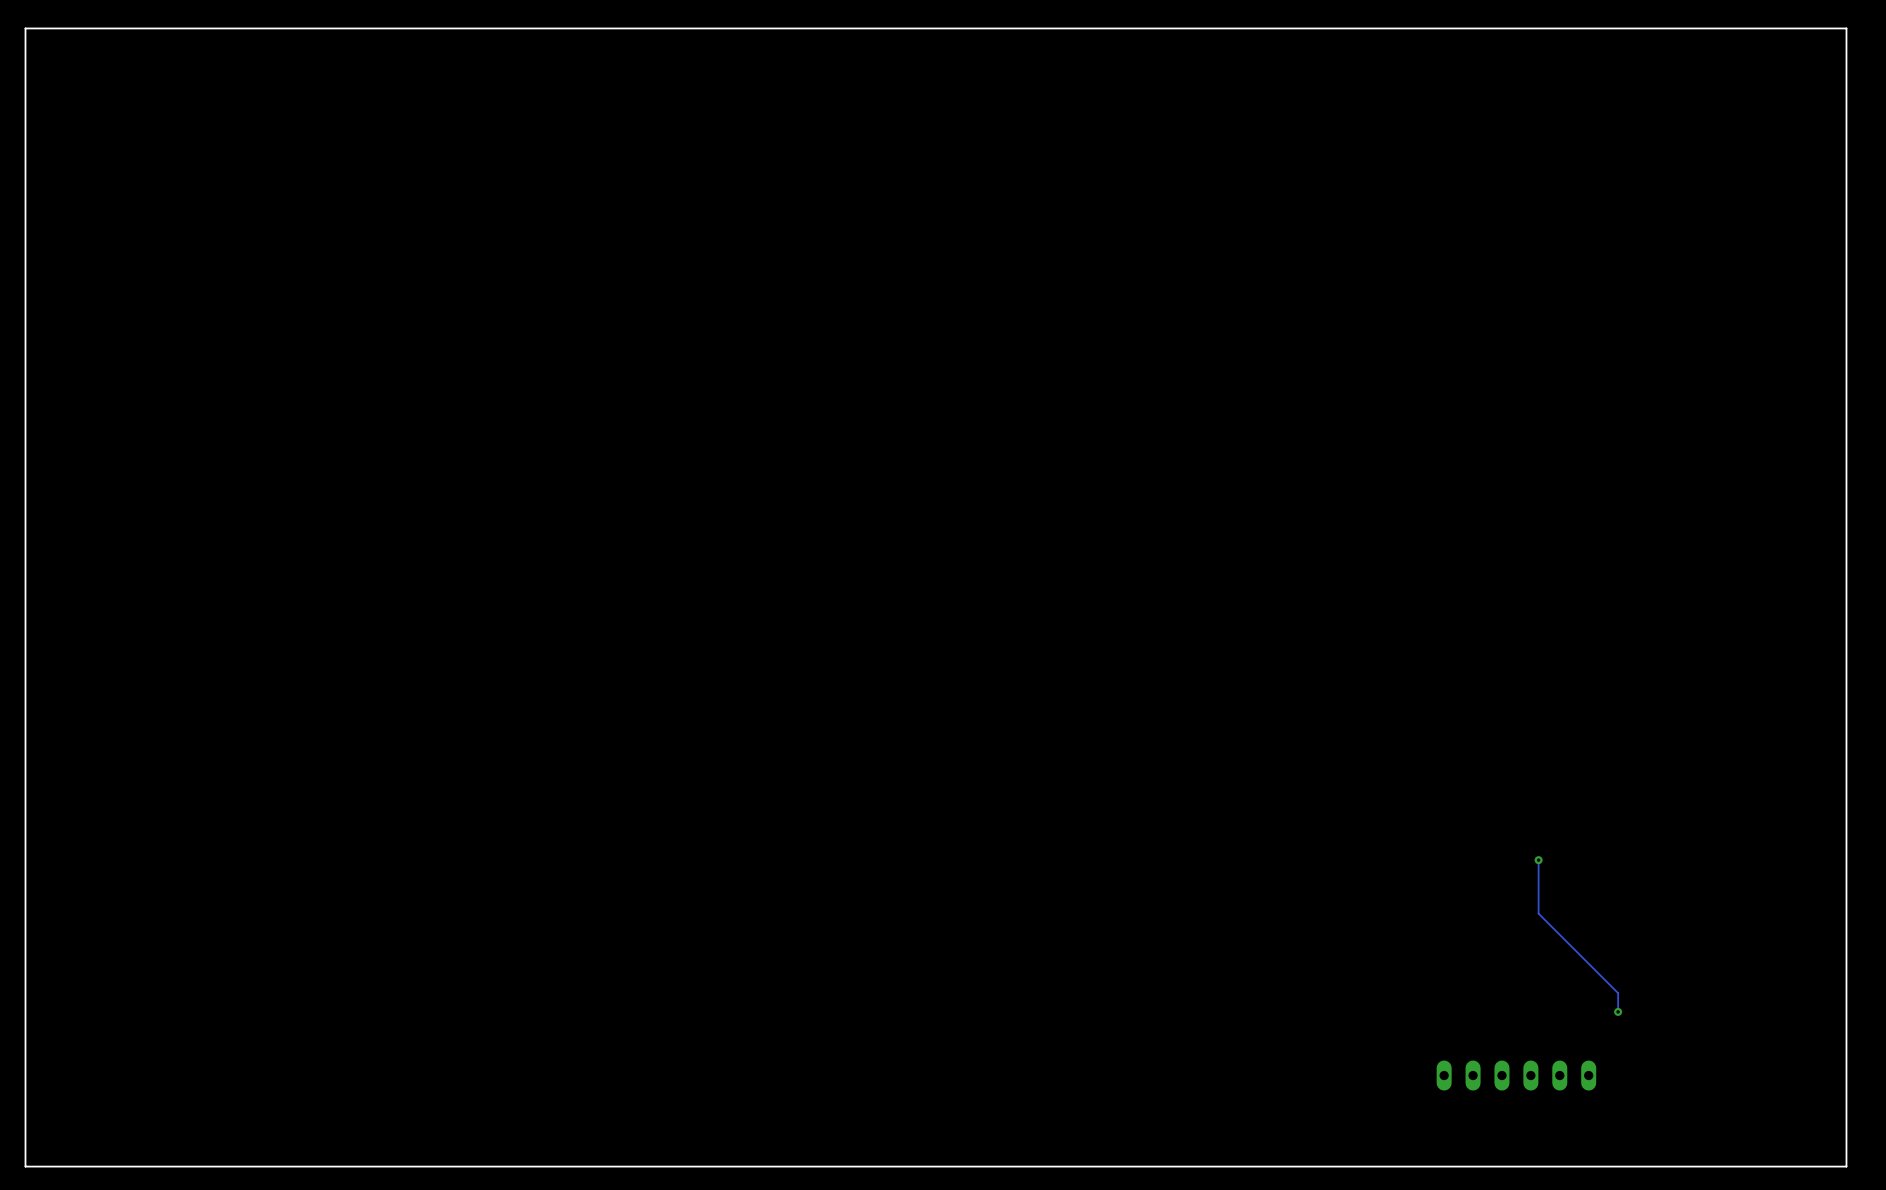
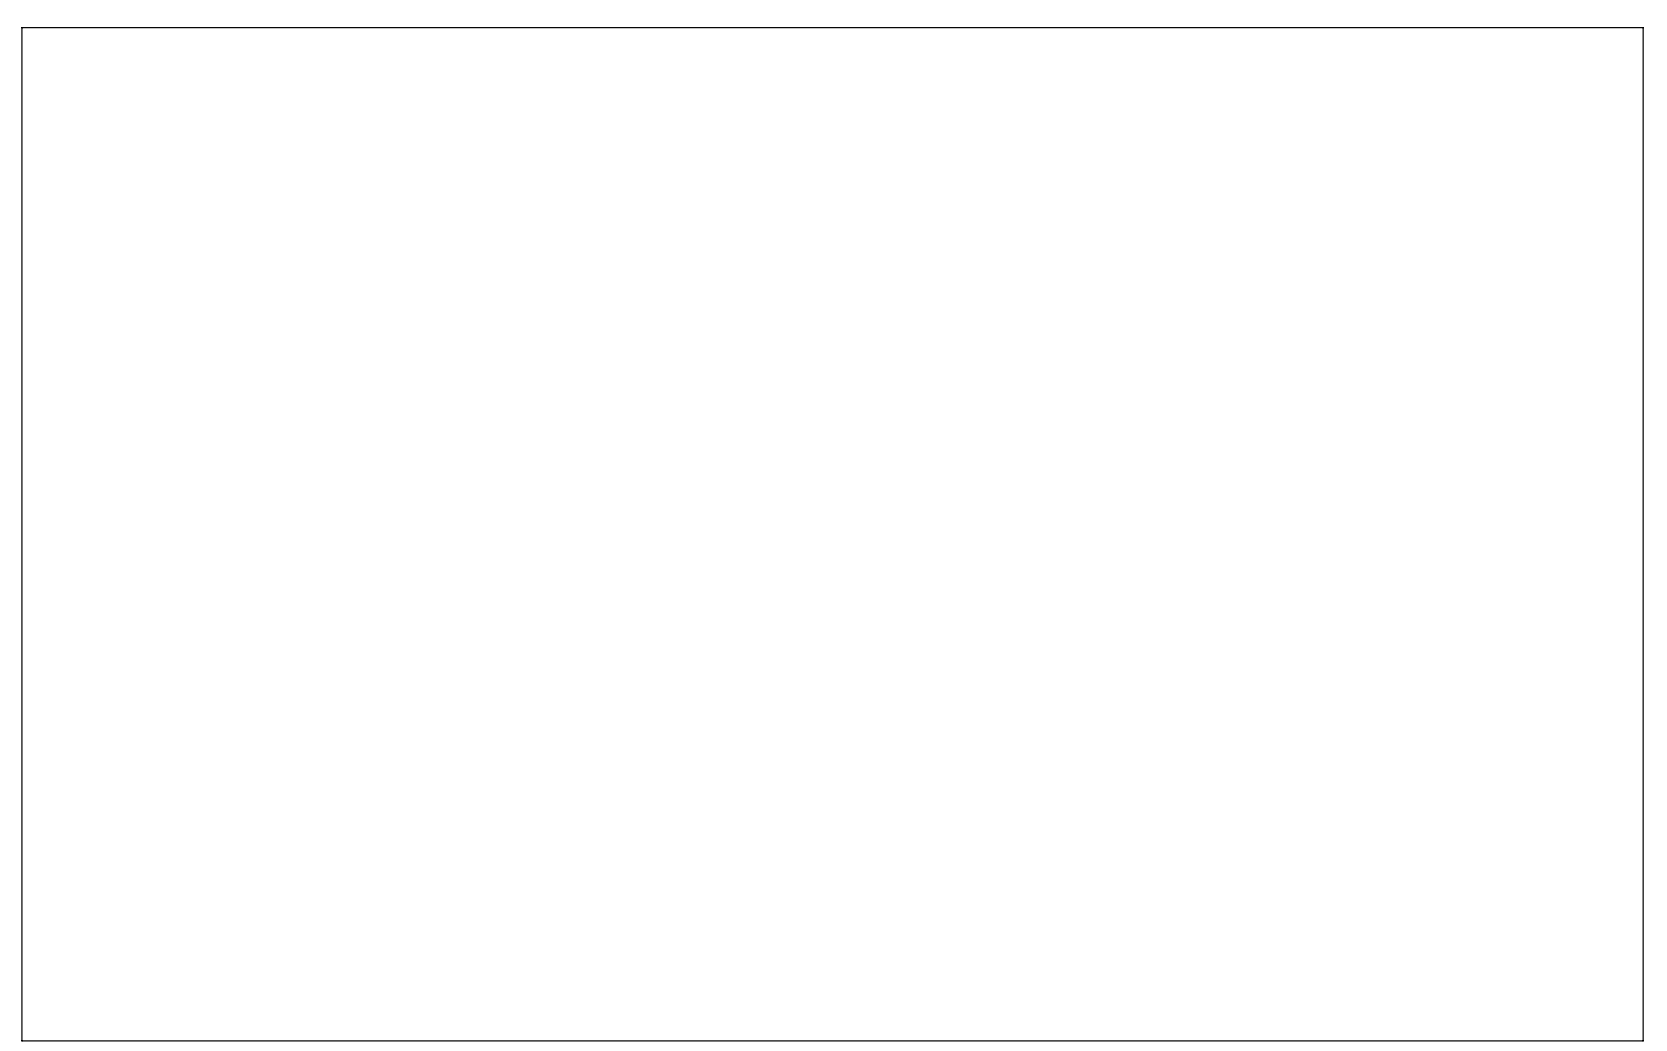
track: (1538, 860) (1538, 913) (1618, 993) (1618, 1011) -> none
via: (1538, 860) -> none
via: (1618, 1011) -> none
part: (1516, 1075) -> none

